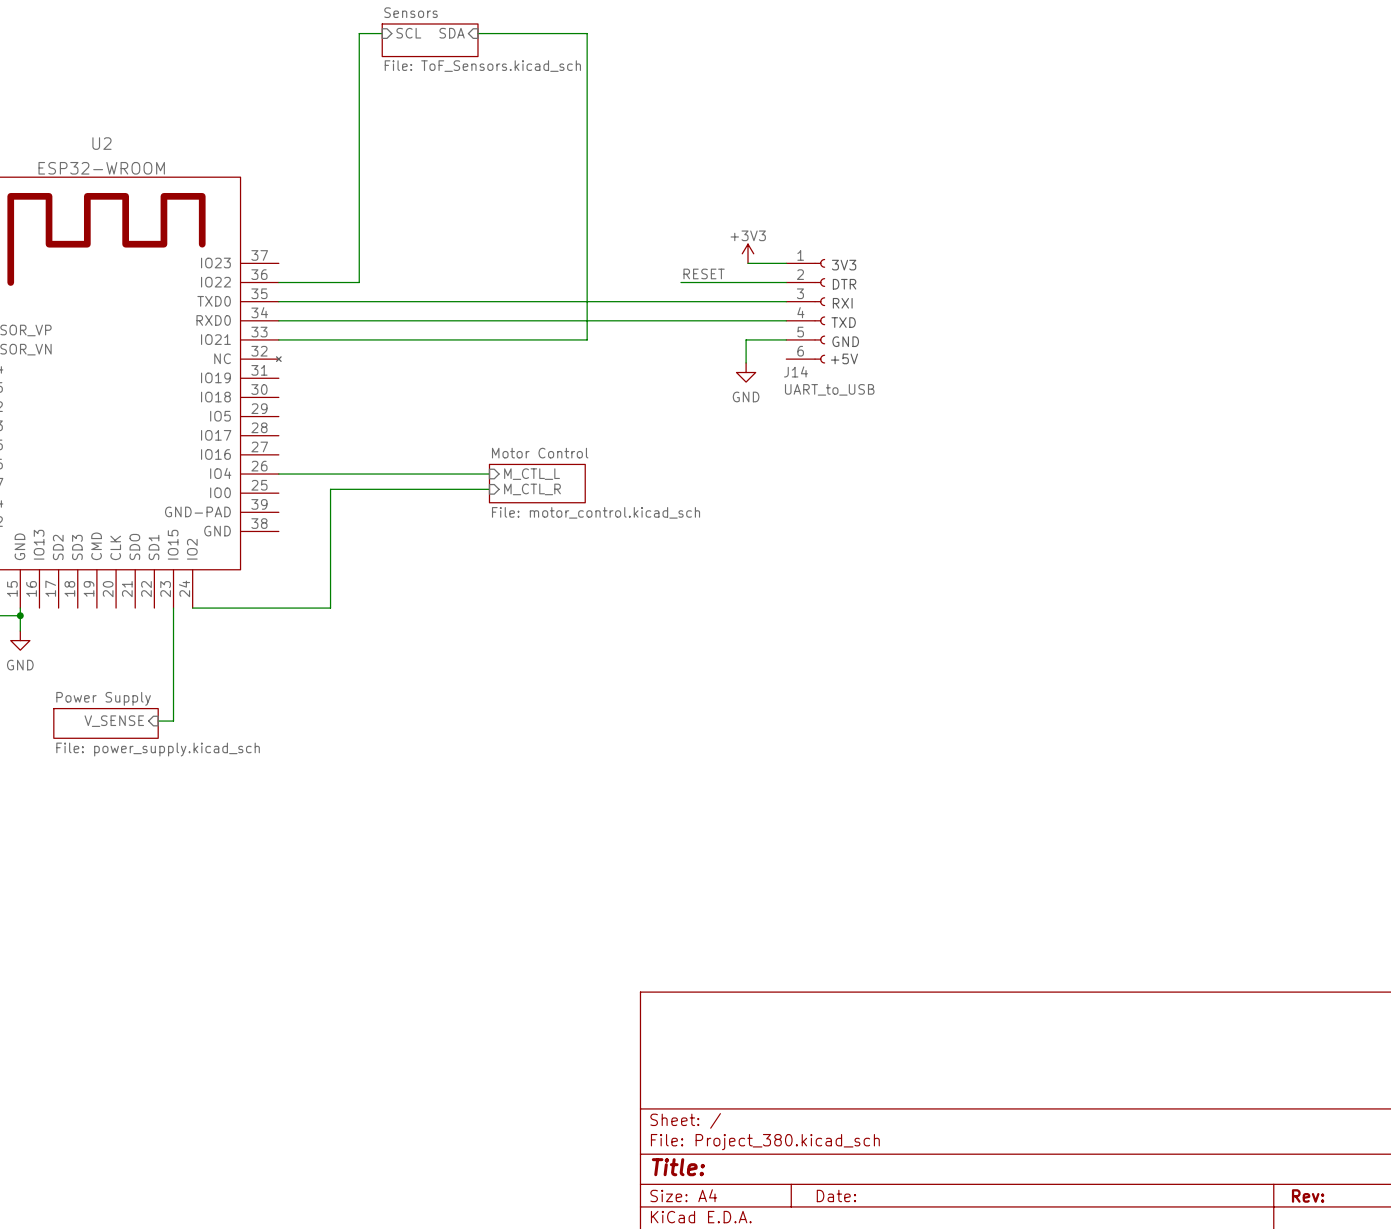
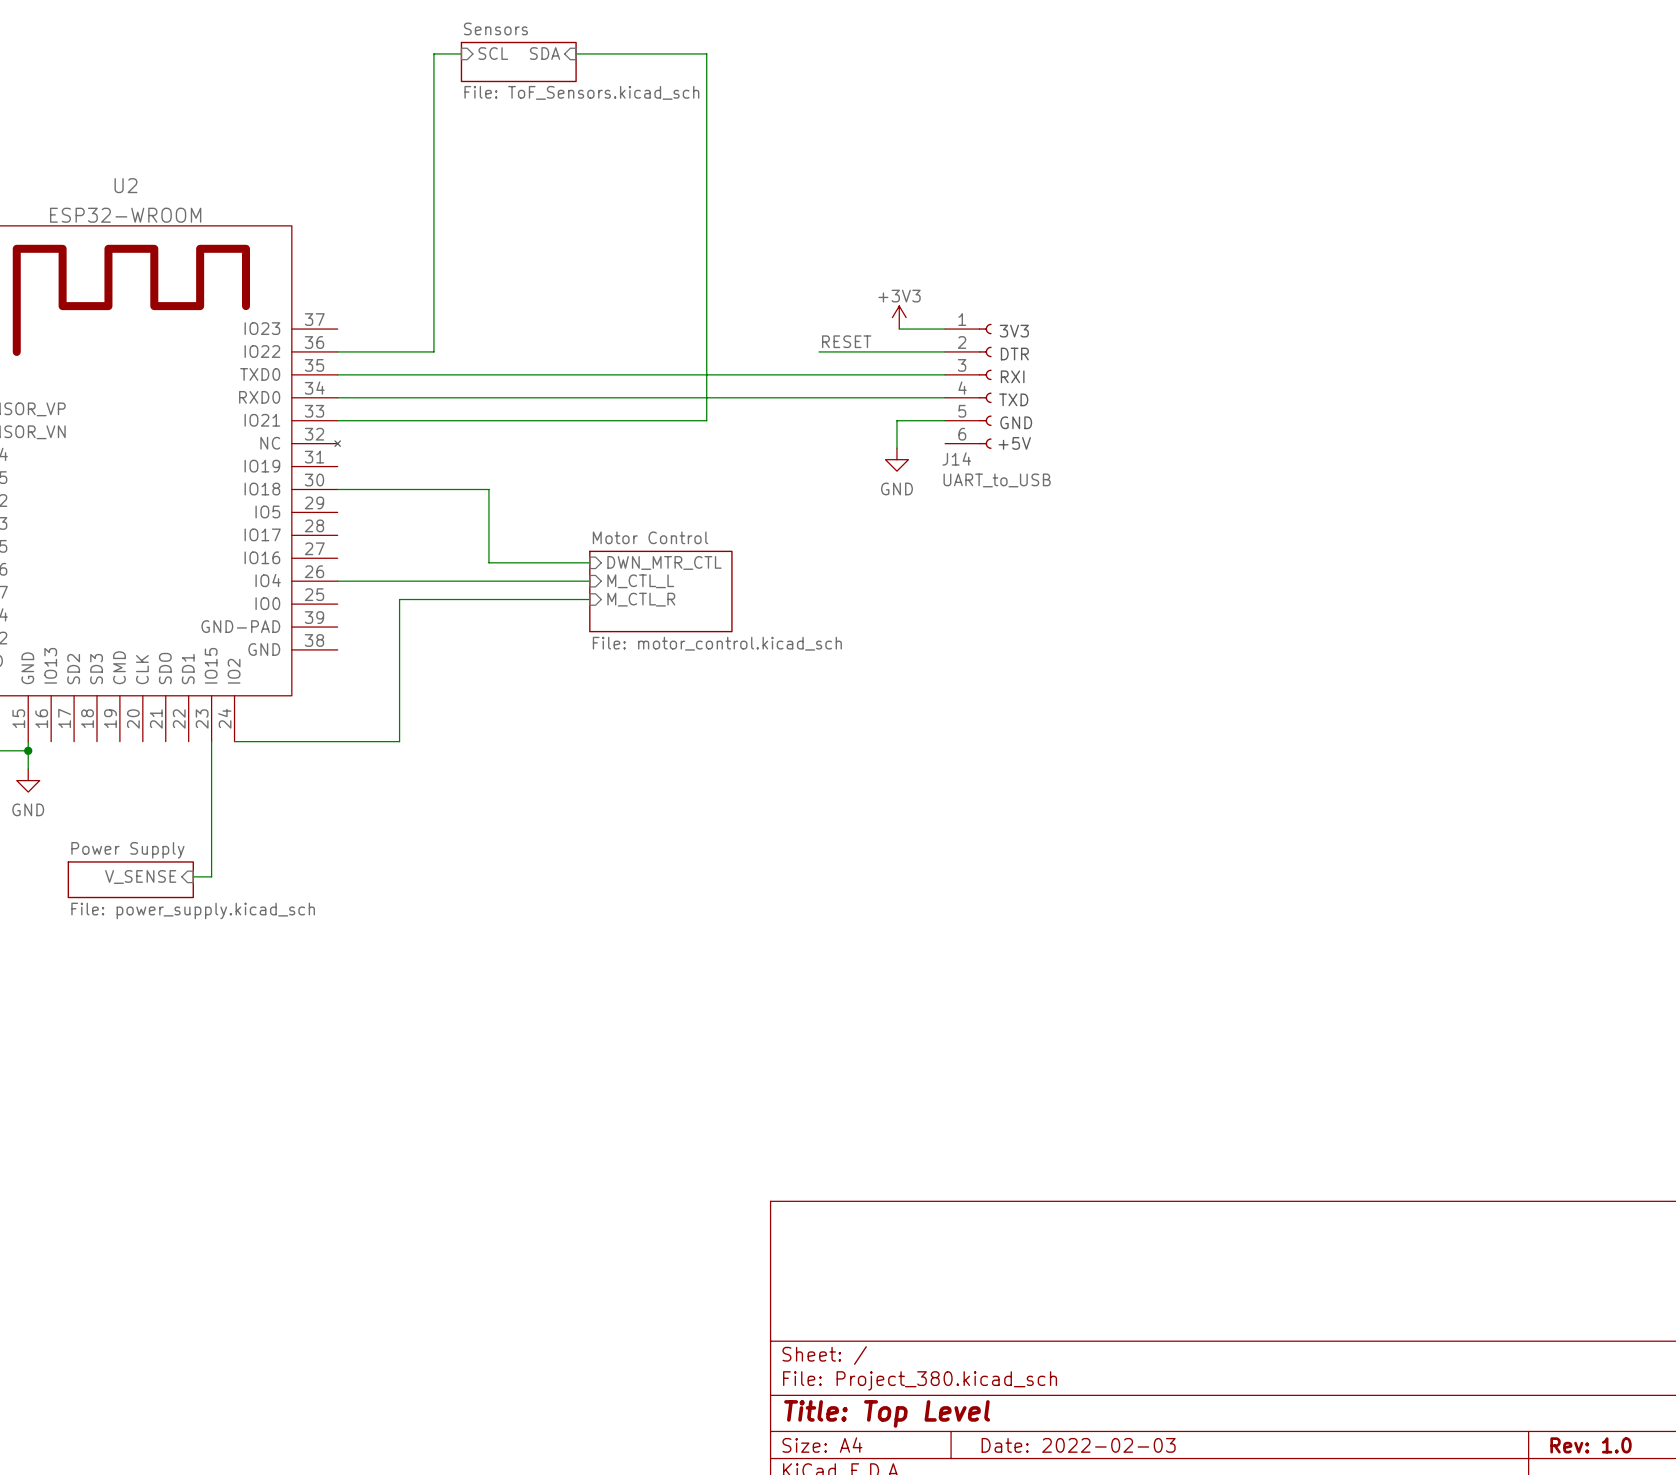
wire: none -> (337, 489) (488, 489) (488, 562) (589, 562)
sheet pin: none -> DWN_MTR_CTL (664, 562)
sheet Motor Control: none -> File: motor_control.kicad_sch (660, 591)
sheet Motor Control: File: motor_control.kicad_sch (537, 483) -> none
title block: Title: (678, 1167) -> Title: Top Level (887, 1413)
title block: Date: (836, 1195) -> Date: 2022-02-03 (1078, 1445)
title block: Rev: (1308, 1195) -> Rev: 1.0 (1591, 1445)

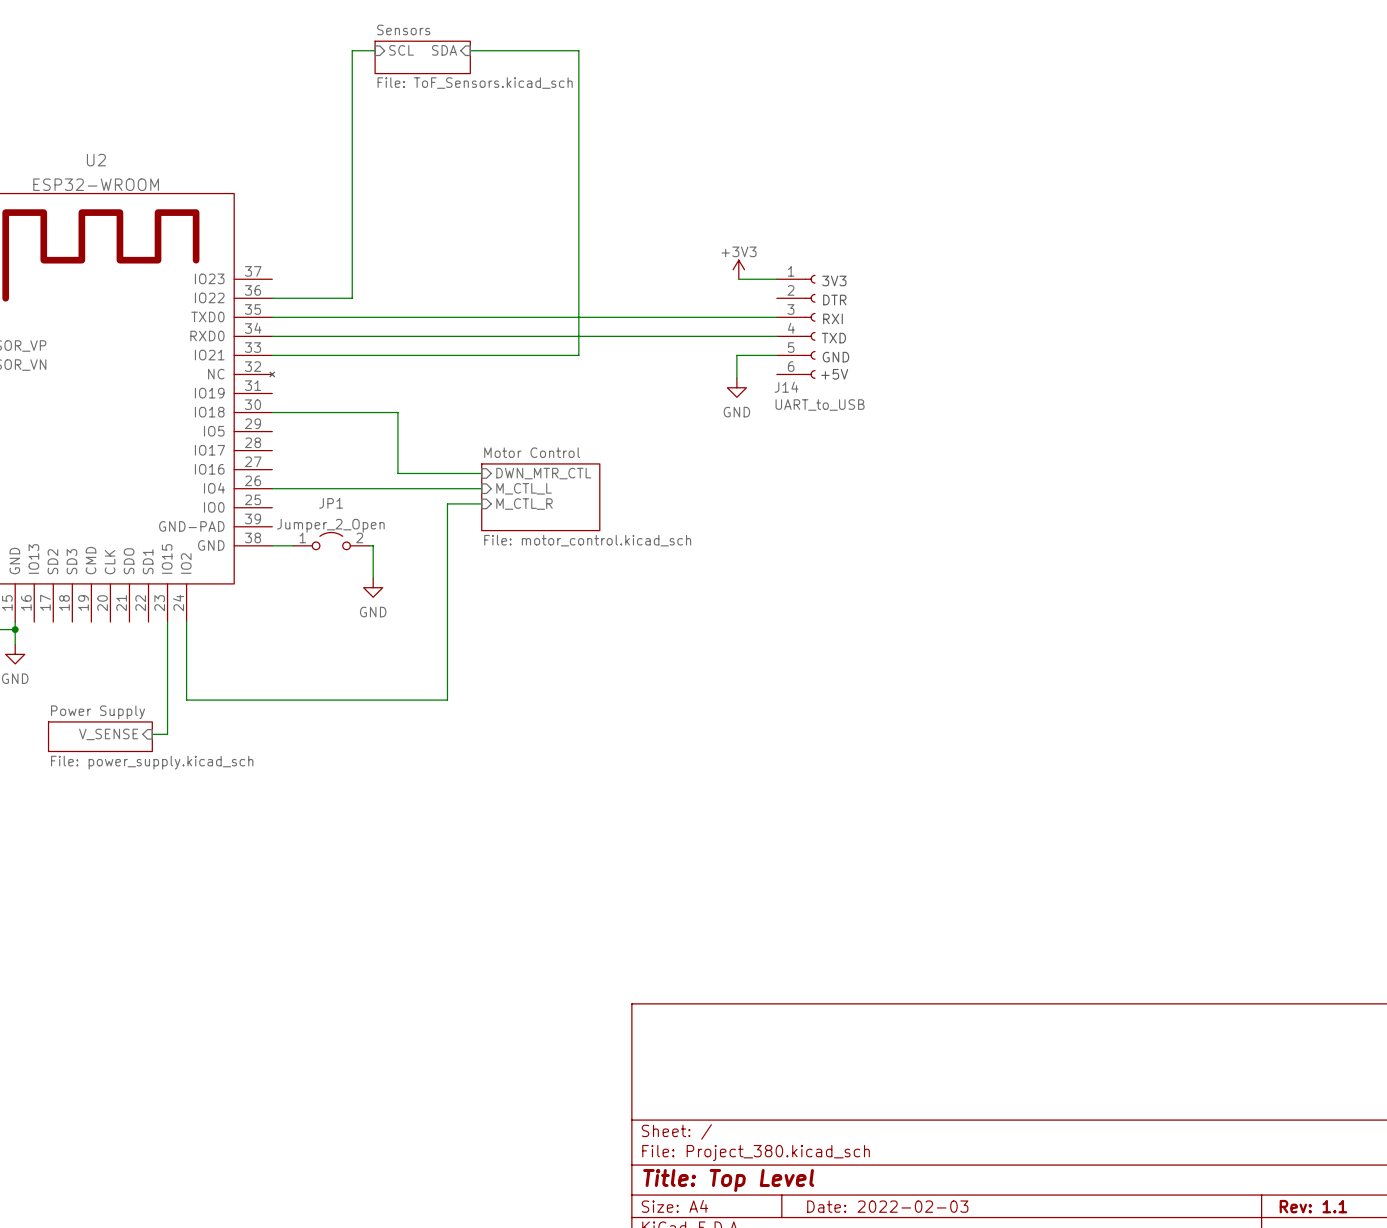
label: RESET (846, 341) -> none
wire: (819, 351) (945, 351) -> none
wire: (548, 599) (399, 599) (399, 741) (234, 741) -> (447, 503) (447, 700) (186, 700) (186, 622)
JP1: none -> Jumper_2_Open (331, 541)
wire: none -> (272, 545) (293, 545)
wire: none -> (369, 545) (373, 545) (373, 578)
power symbol: none -> GND (373, 587)
title block: Rev: 1.0 (1591, 1445) -> Rev: 1.1 (1313, 1206)

